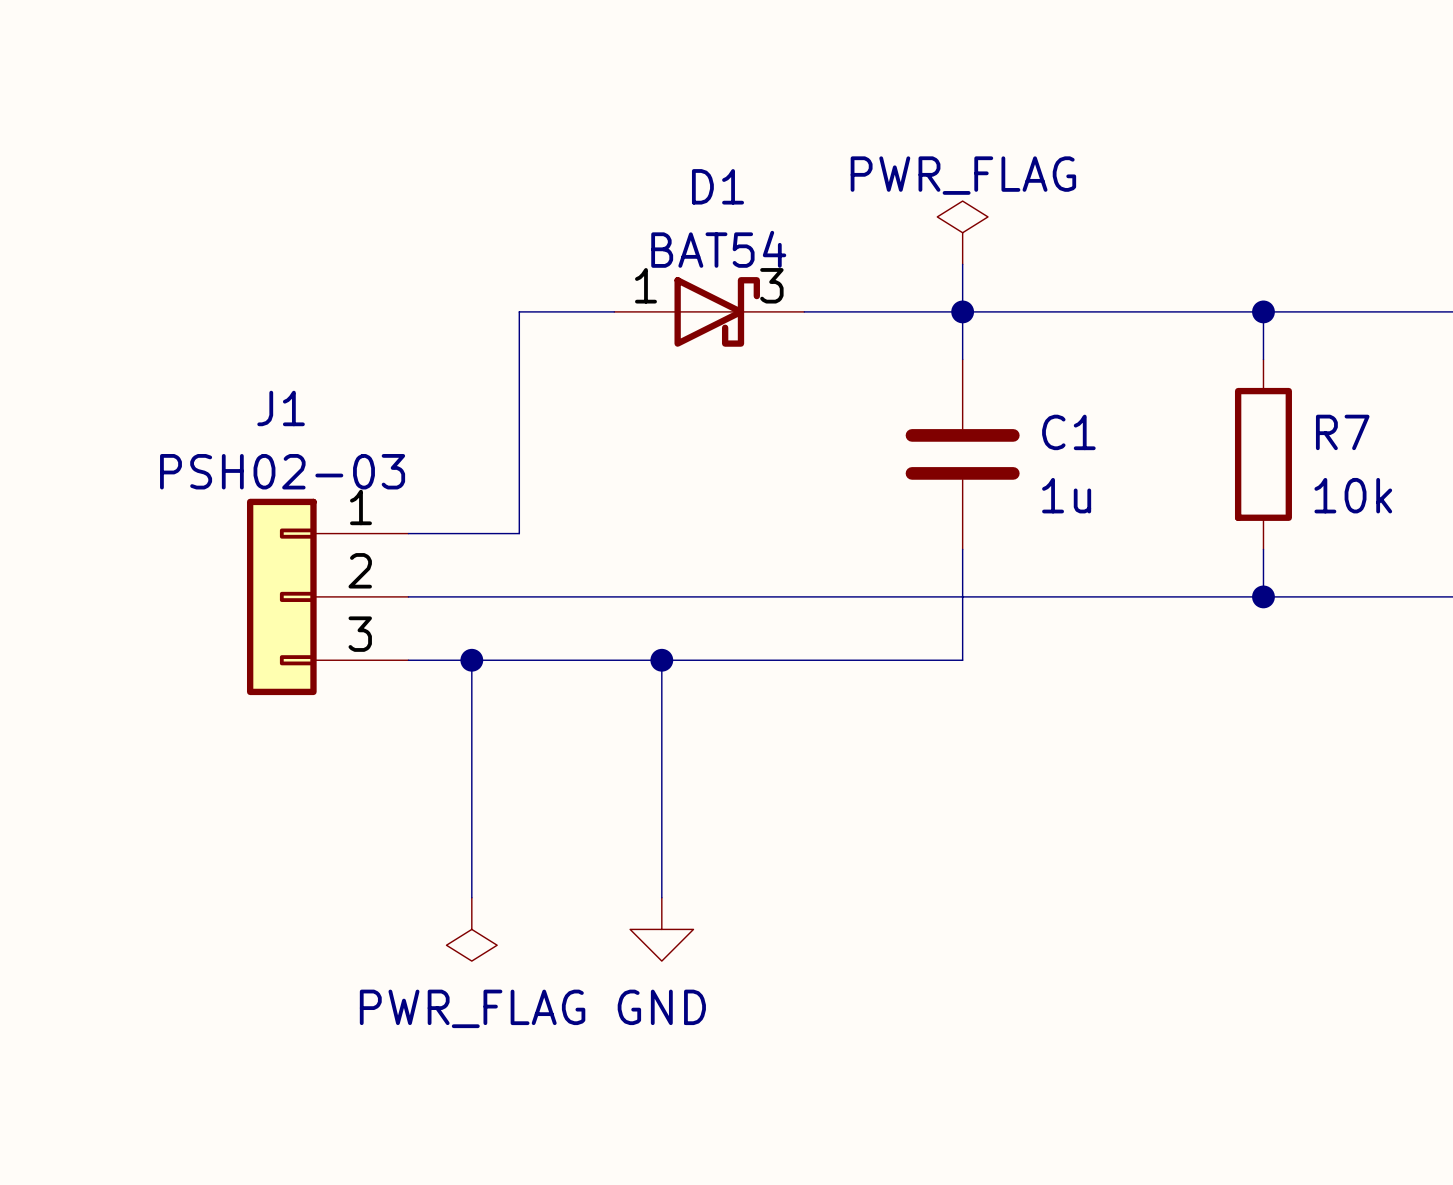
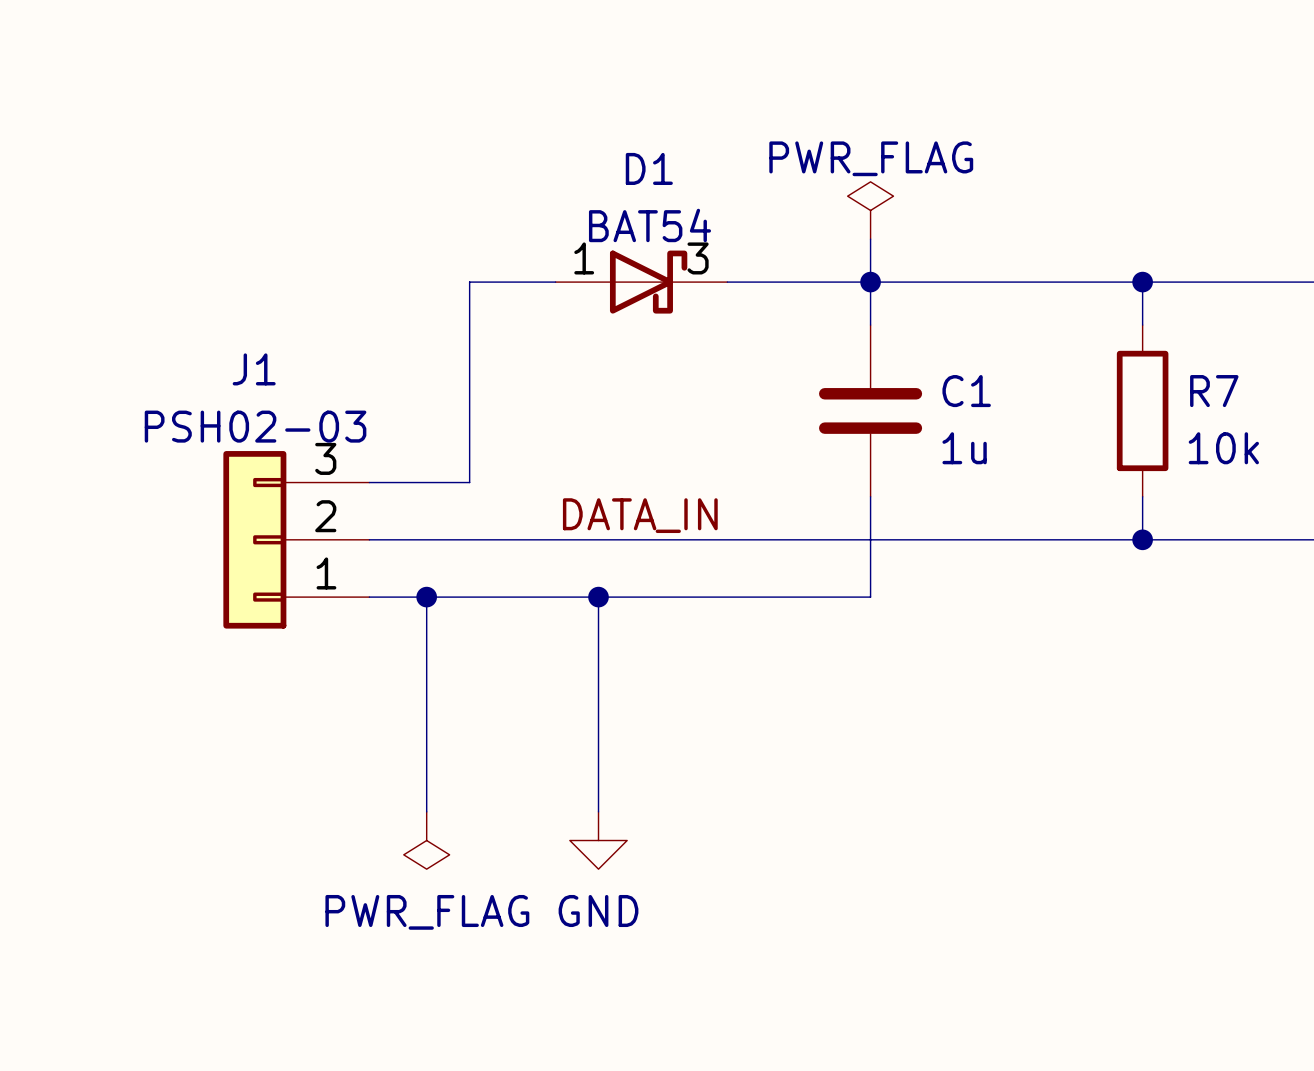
label: none -> DATA_IN (640, 515)
J1 flip: as is (281, 596) -> up-down (254, 539)

